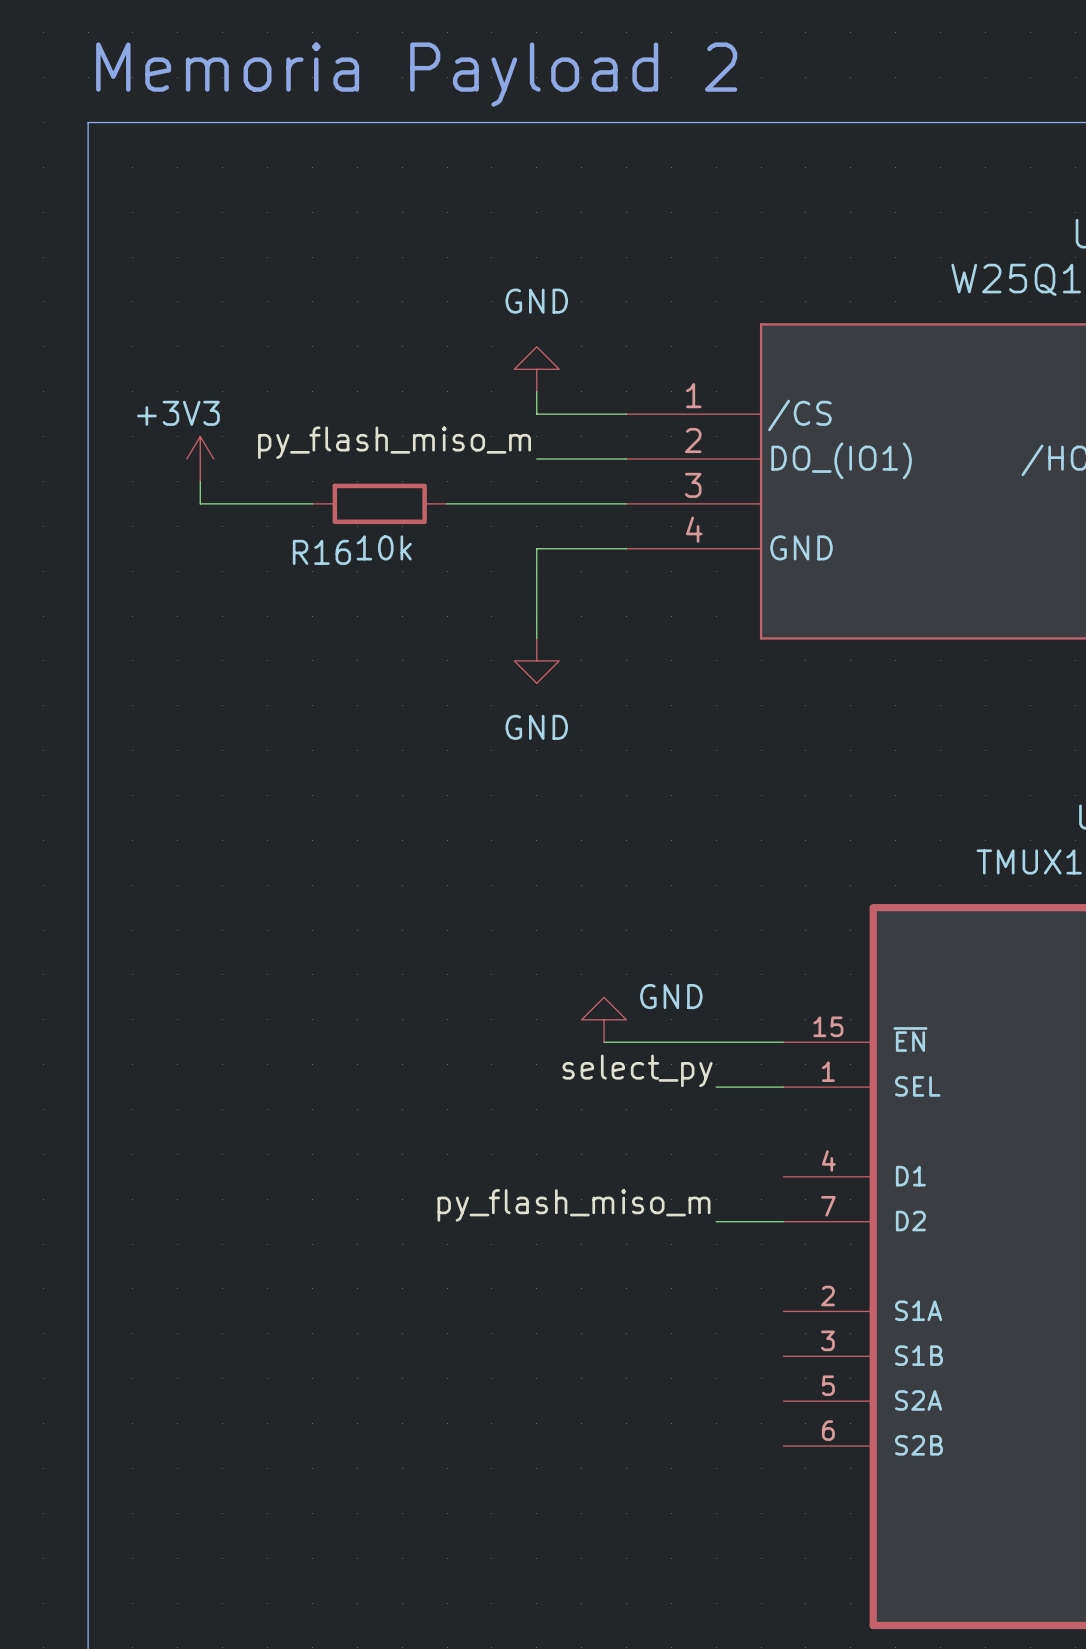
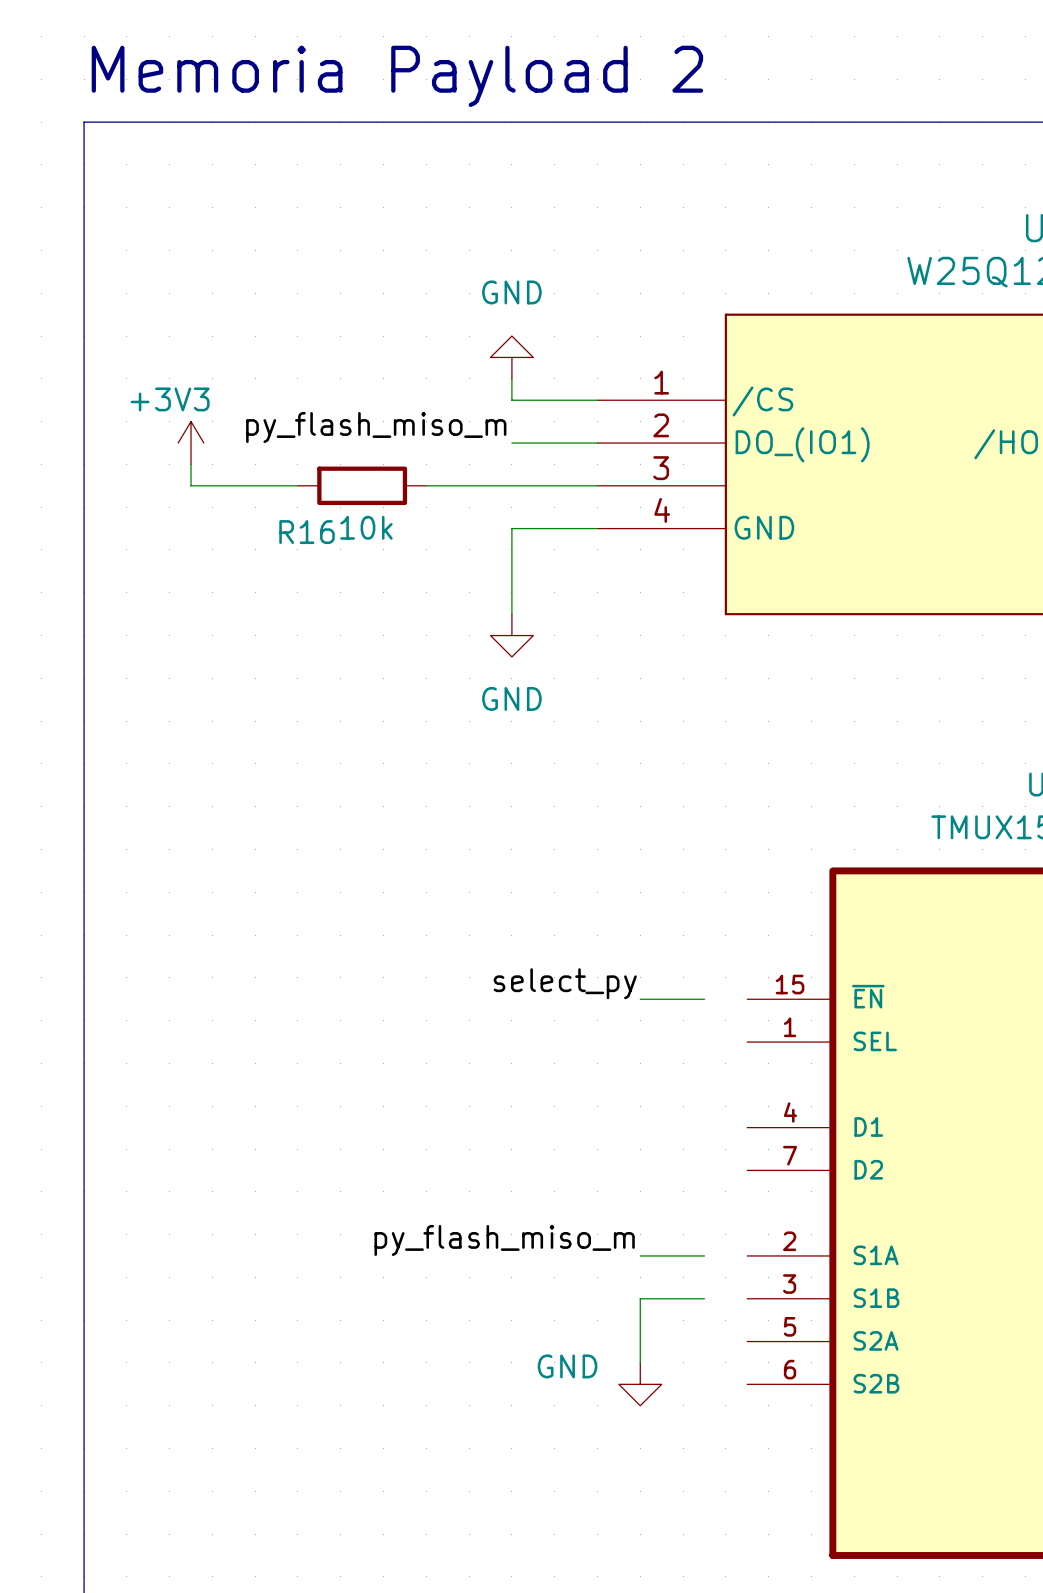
power symbol: GND (604, 1019) -> none
wire: (604, 1042) (671, 1042) -> none
wire: (738, 1042) (783, 1042) -> none
label position: select_py (637, 1070) -> select_py (565, 983)
wire: (716, 1087) (783, 1087) -> none
label position: py_flash_miso_m (573, 1205) -> py_flash_miso_m (504, 1240)
wire: (716, 1221) (783, 1221) -> (640, 1255) (704, 1255)
wire: none -> (704, 1298) (640, 1298) (640, 1362)
power symbol: none -> GND (640, 1384)

